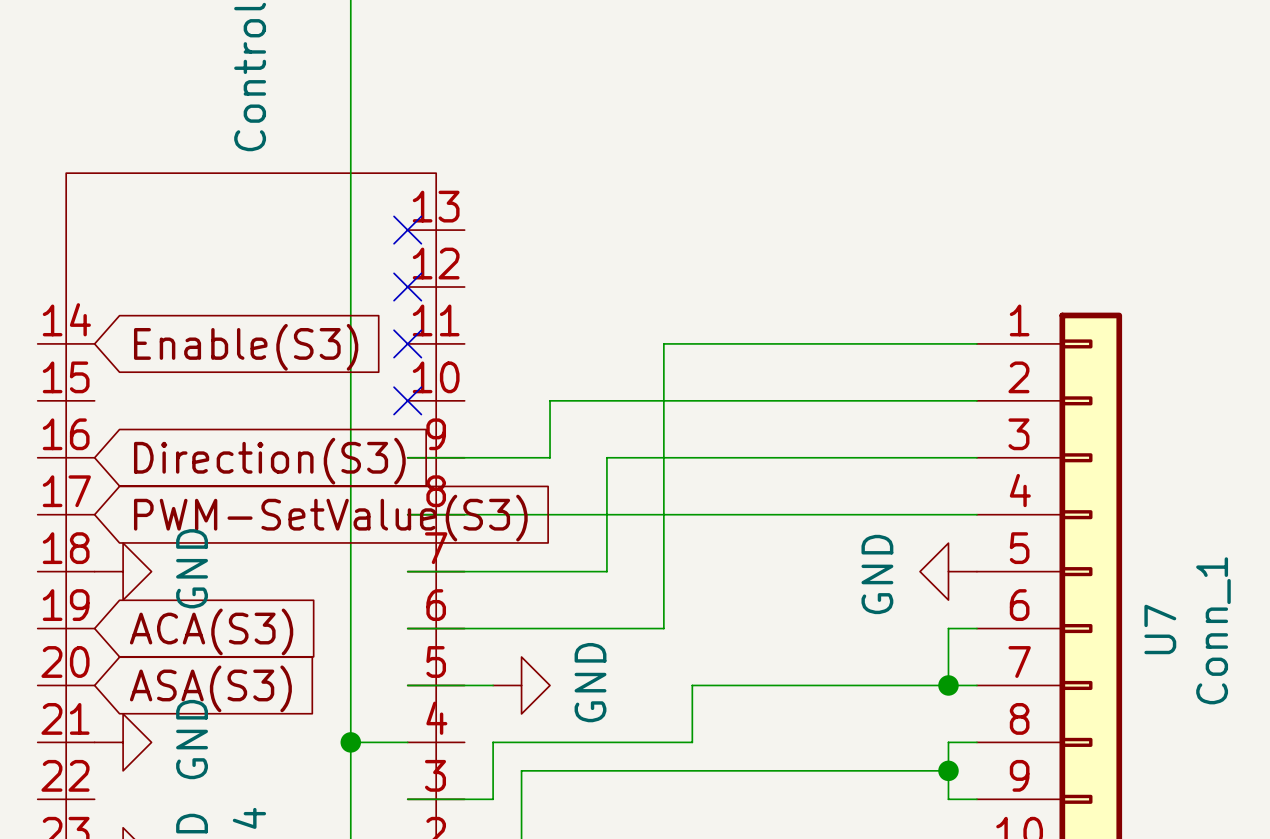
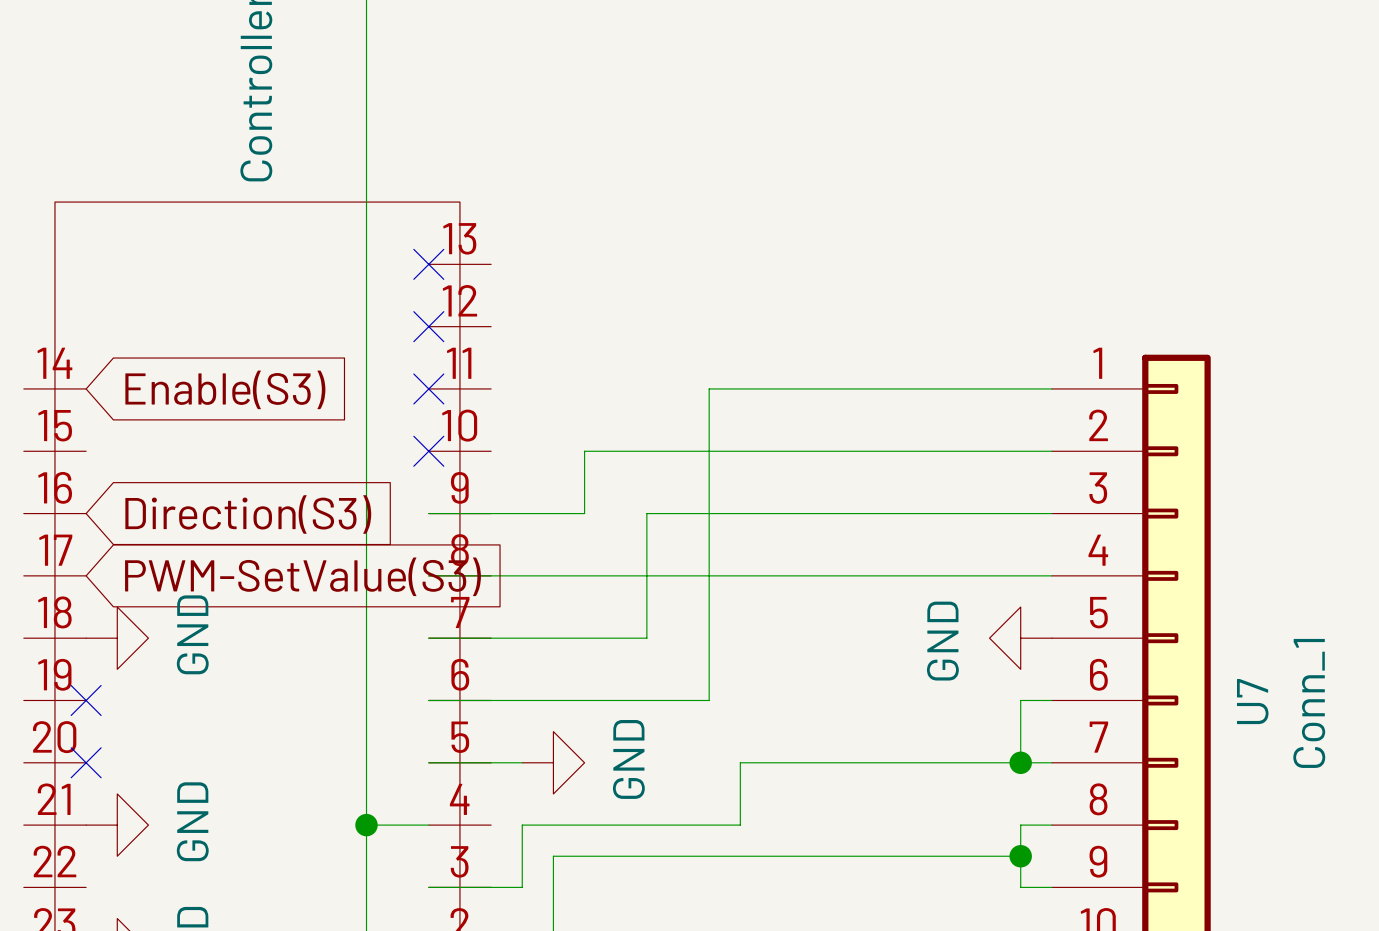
no-connect mark: none -> (86, 700)
global label: ACA(S3) (211, 631) -> none
no-connect mark: none -> (86, 762)
global label: ASA(S3) (210, 688) -> none

